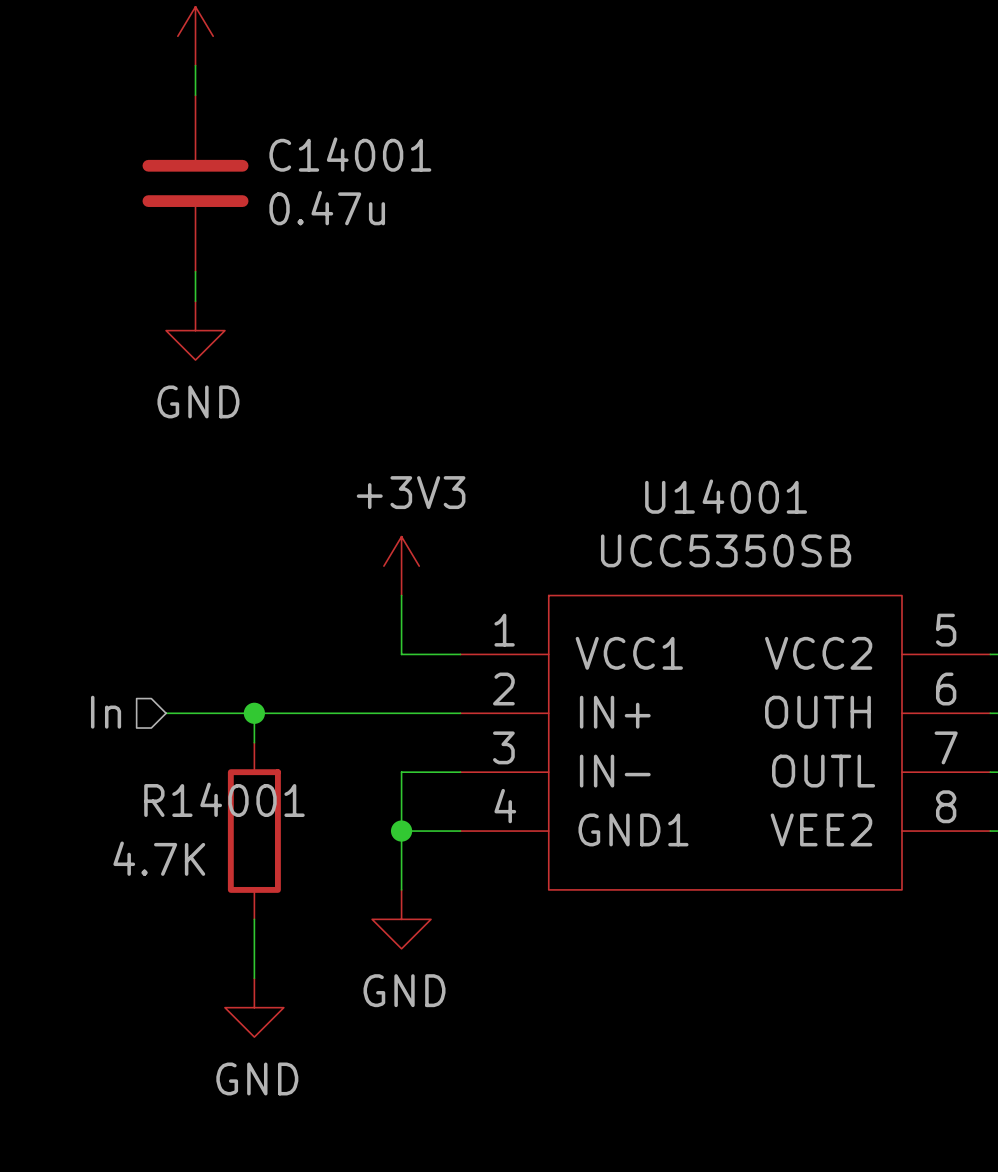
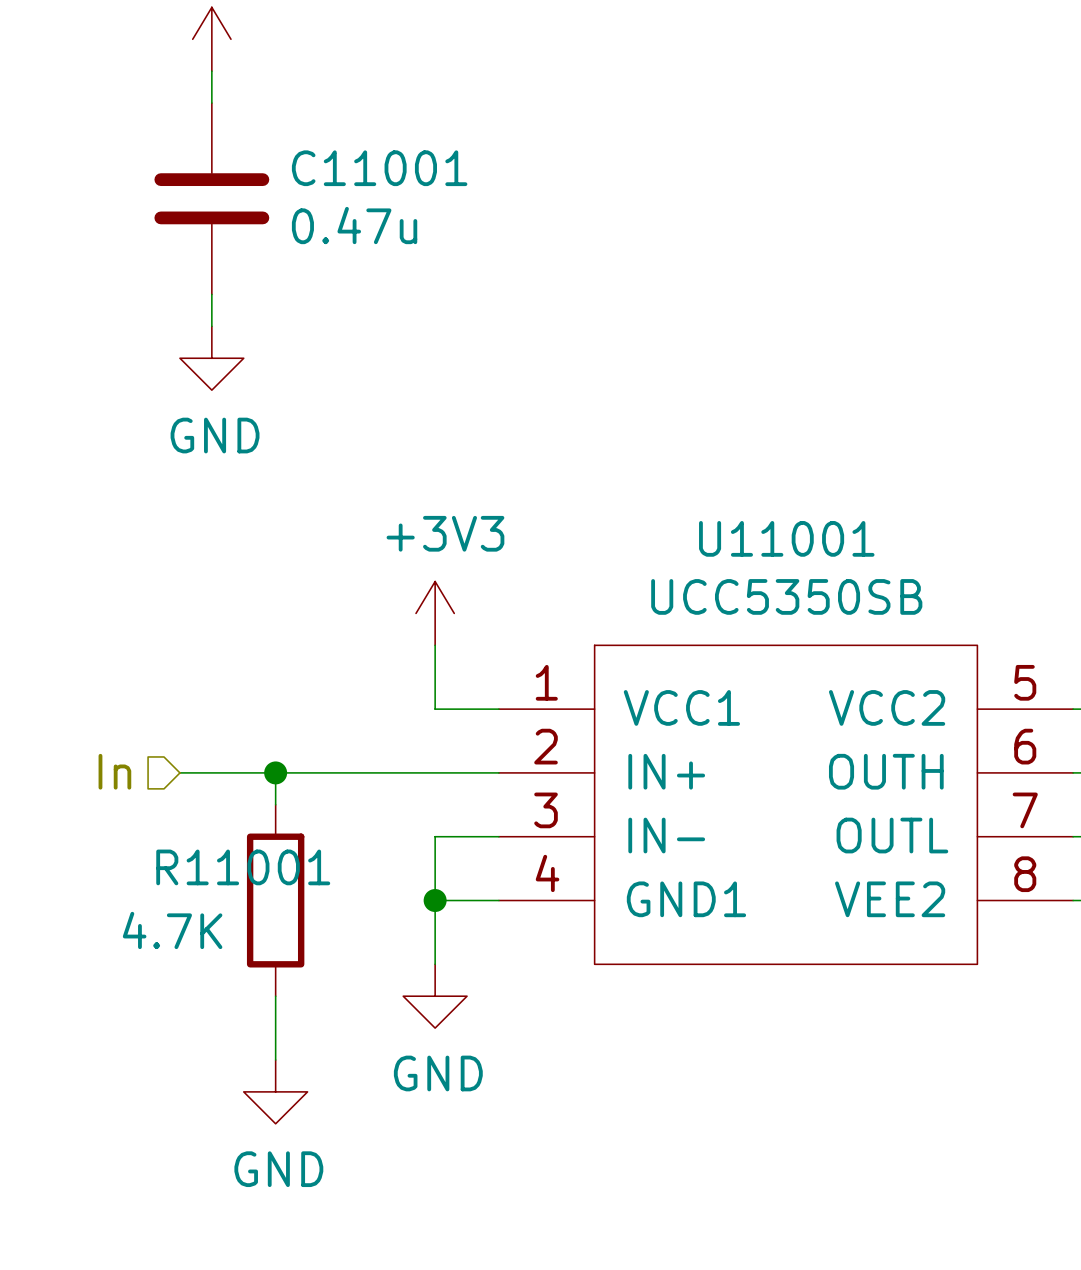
C14001 name: C14001 (350, 154) -> C11001 (379, 168)
U14001 name: U14001 (726, 496) -> U11001 (786, 538)
R14001 name: R14001 (224, 799) -> R11001 (243, 867)

